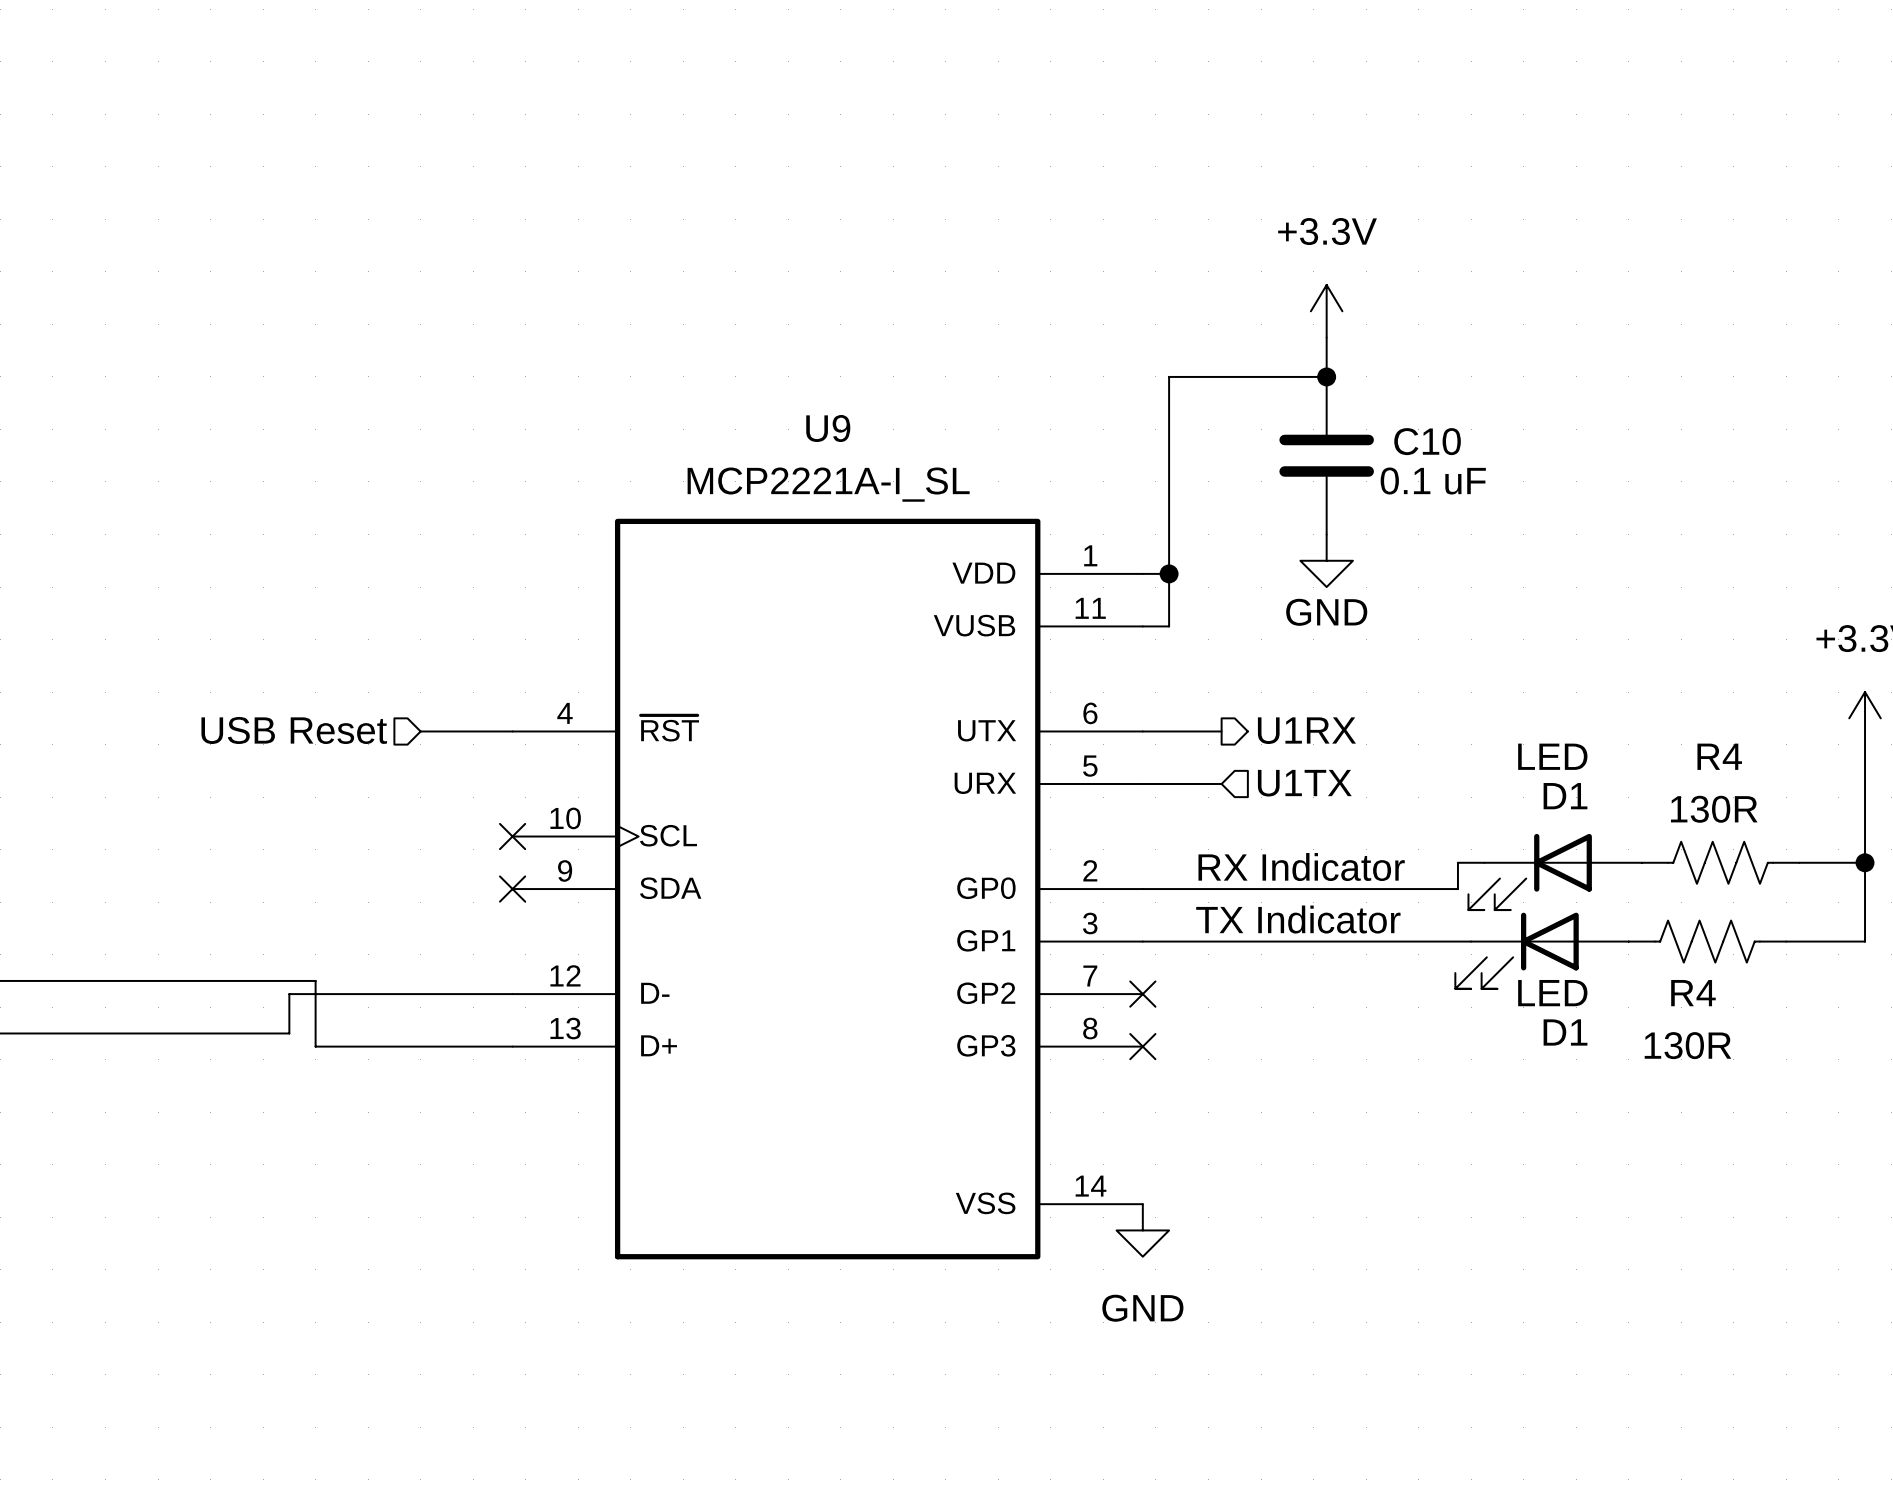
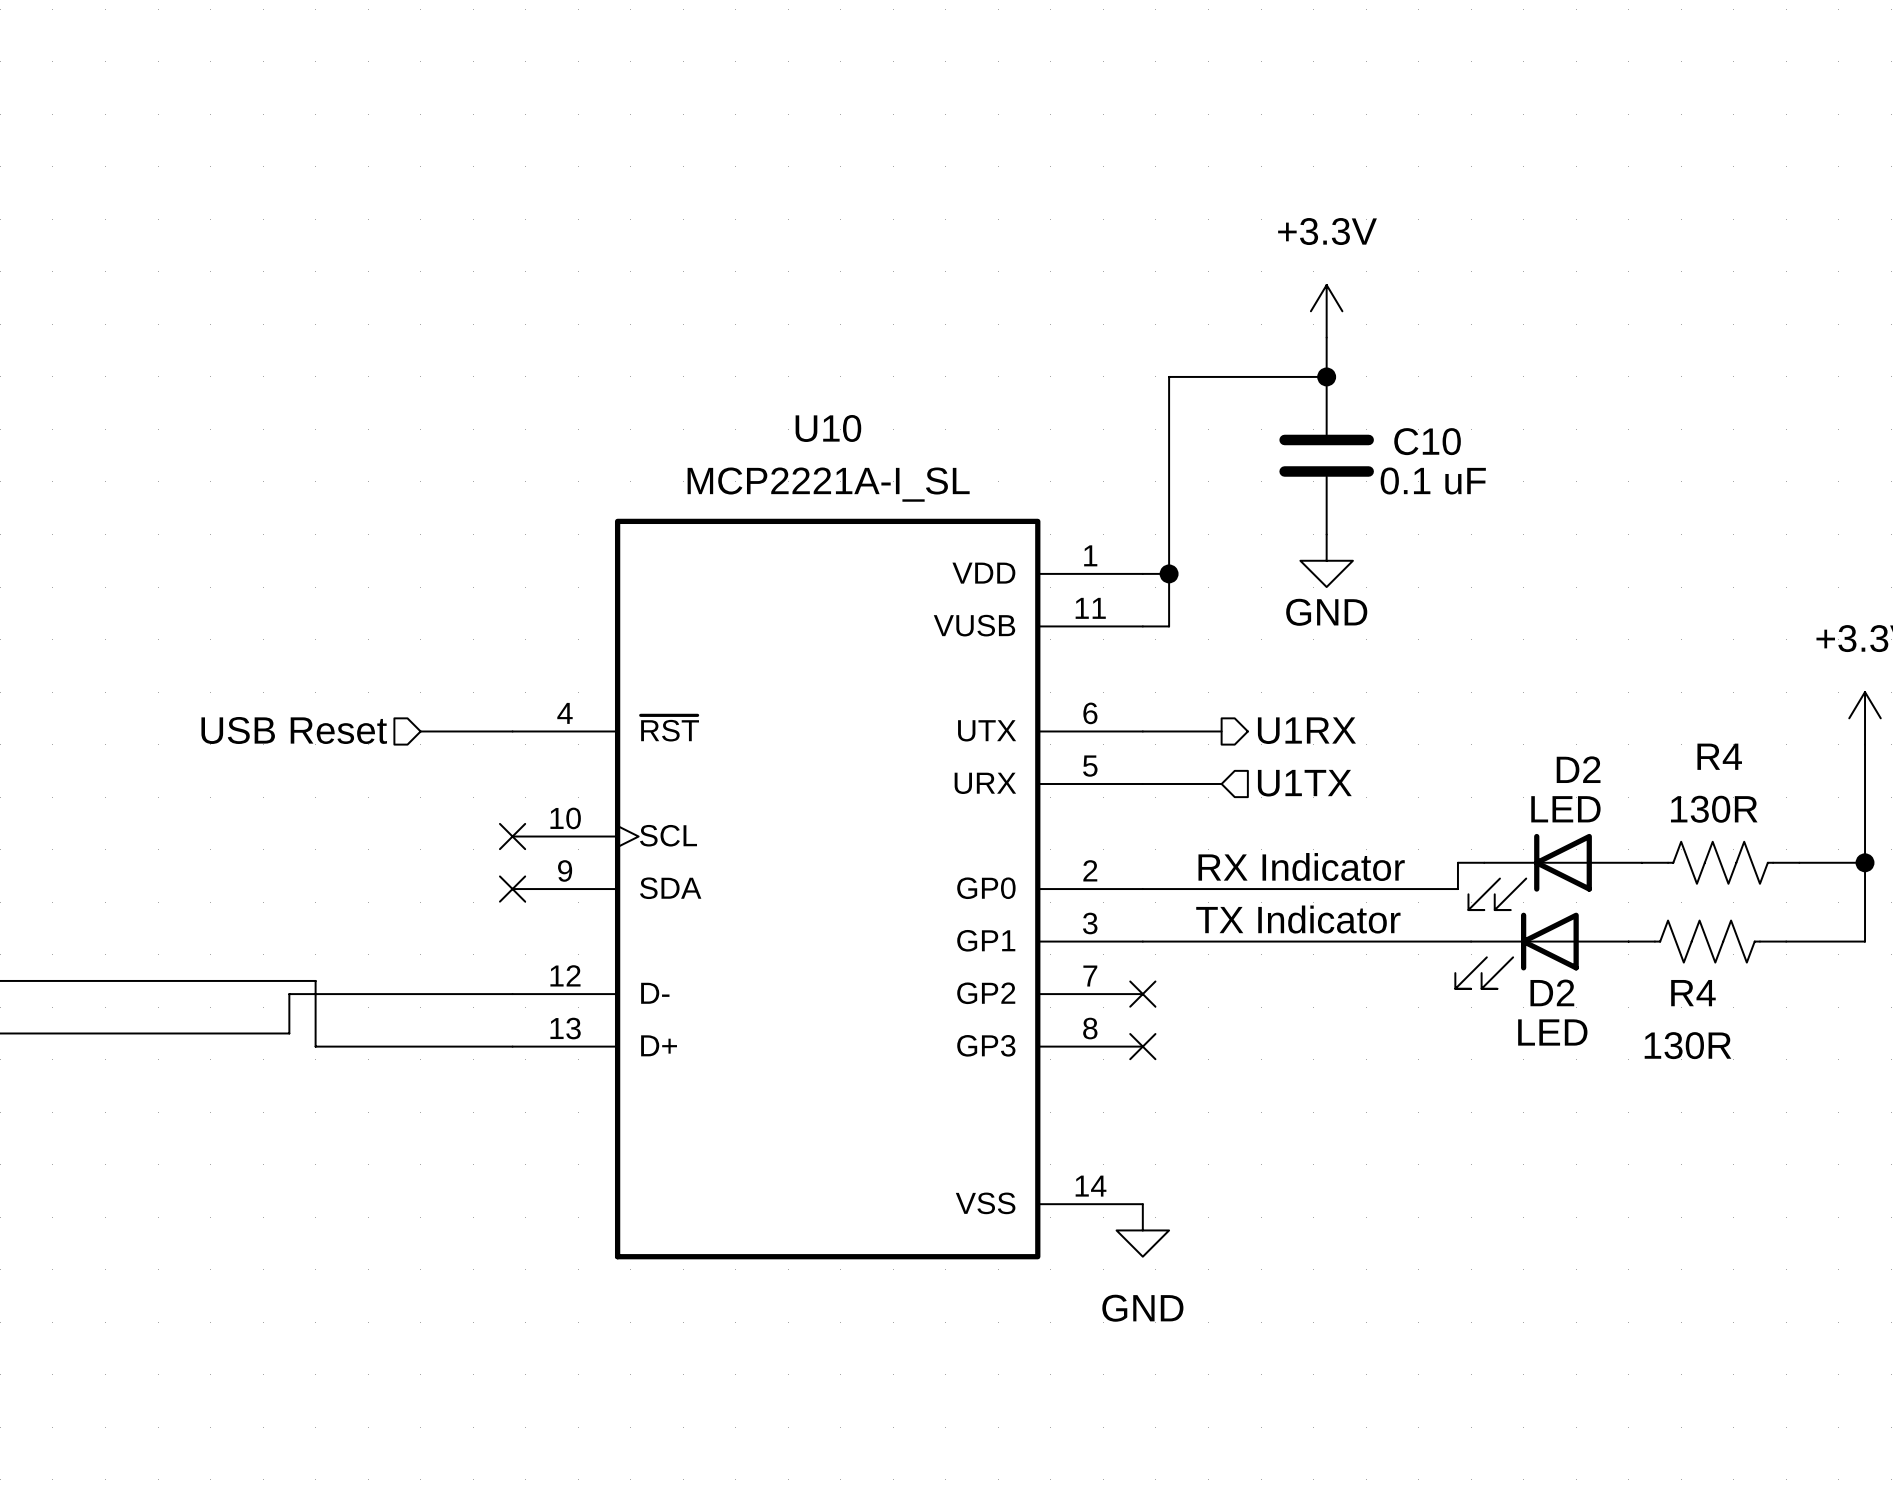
U9 name: U9 (828, 428) -> U10 (828, 428)
D1 value position: LED (1552, 756) -> LED (1565, 809)
D1 name: D1 (1565, 796) -> D2 (1578, 769)
D1 value position: LED (1552, 993) -> LED (1552, 1032)
D1 name: D1 (1565, 1032) -> D2 (1552, 992)

